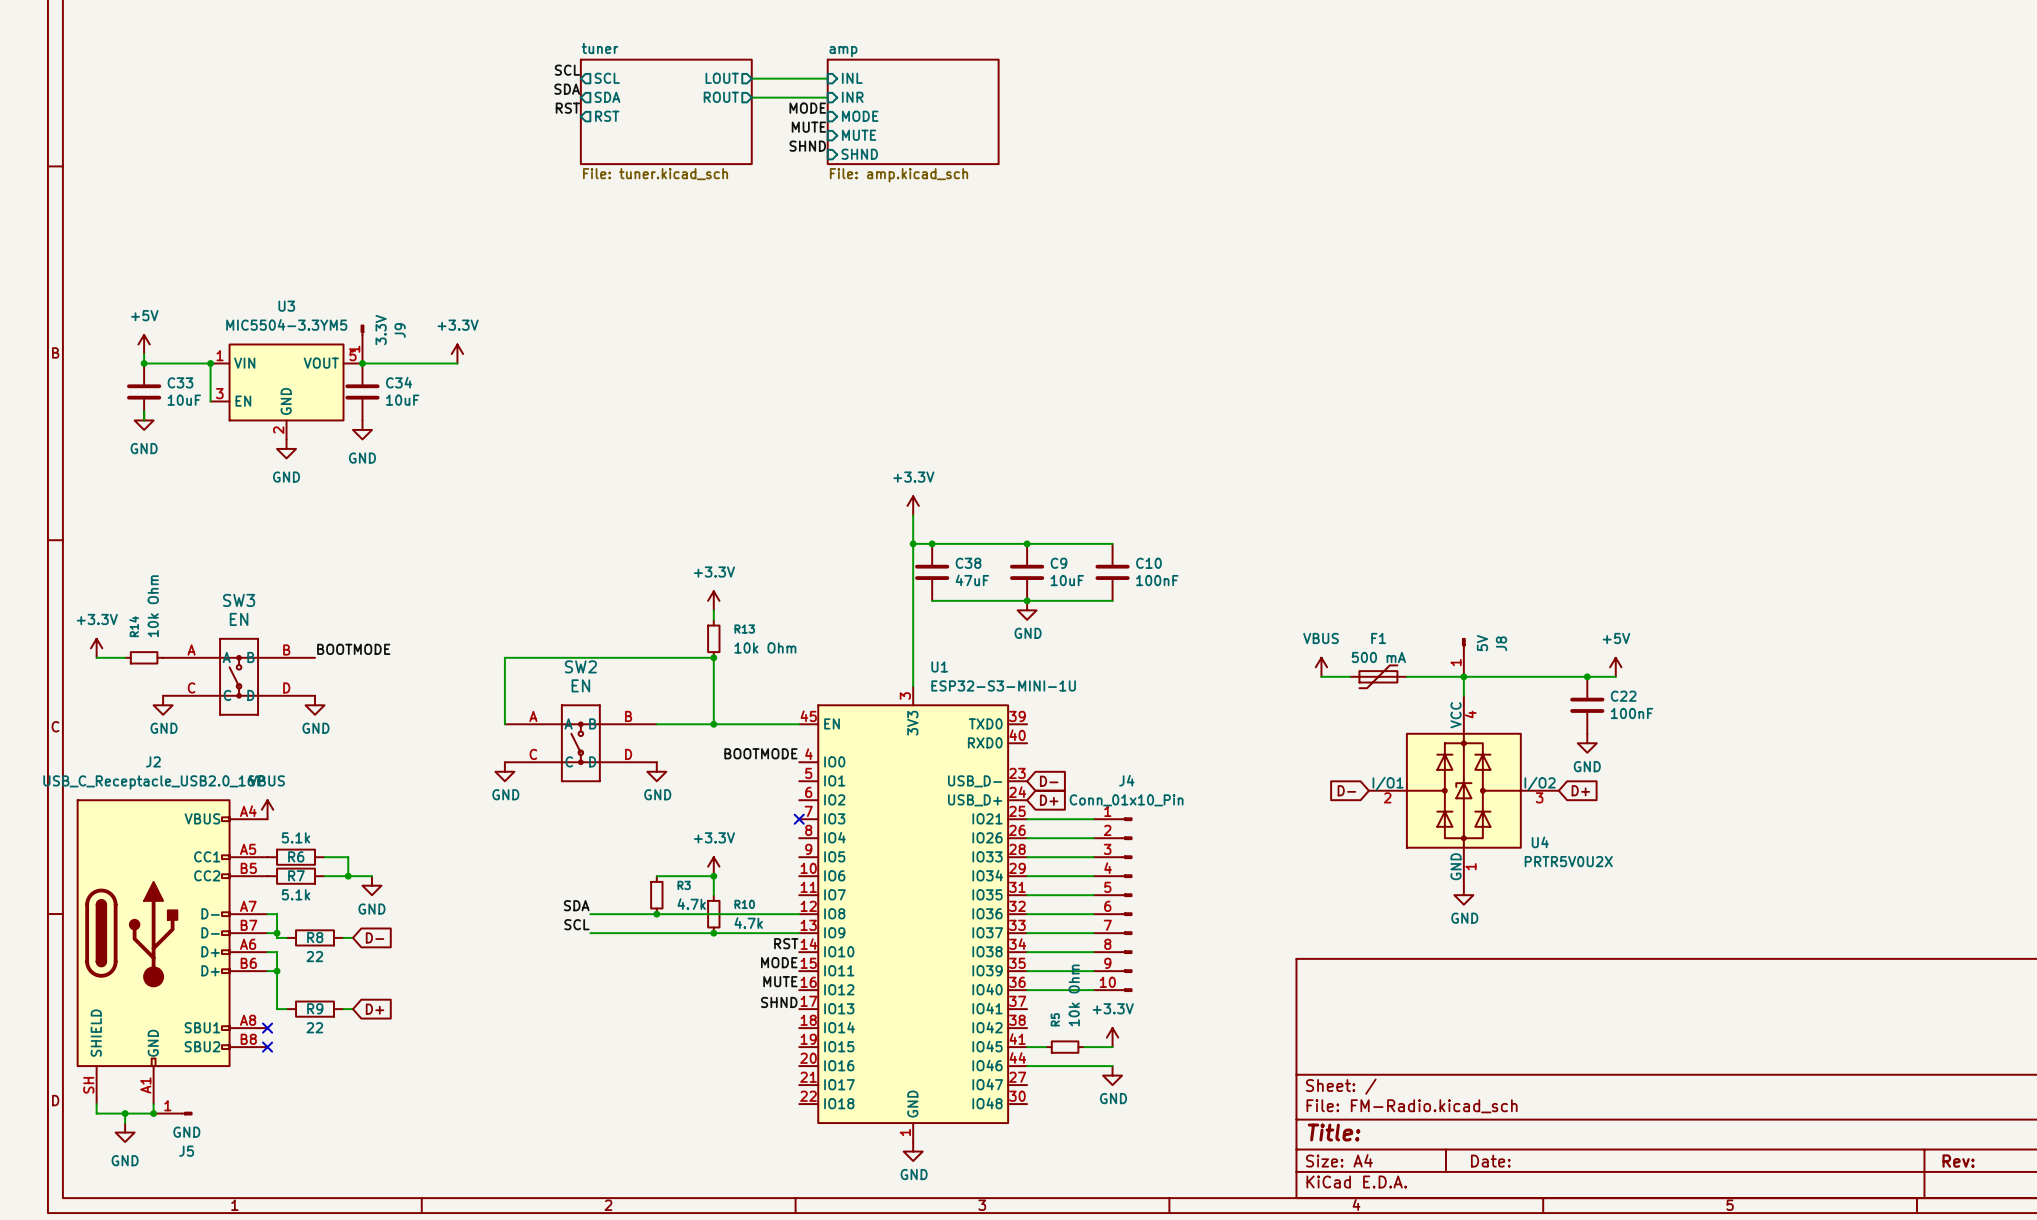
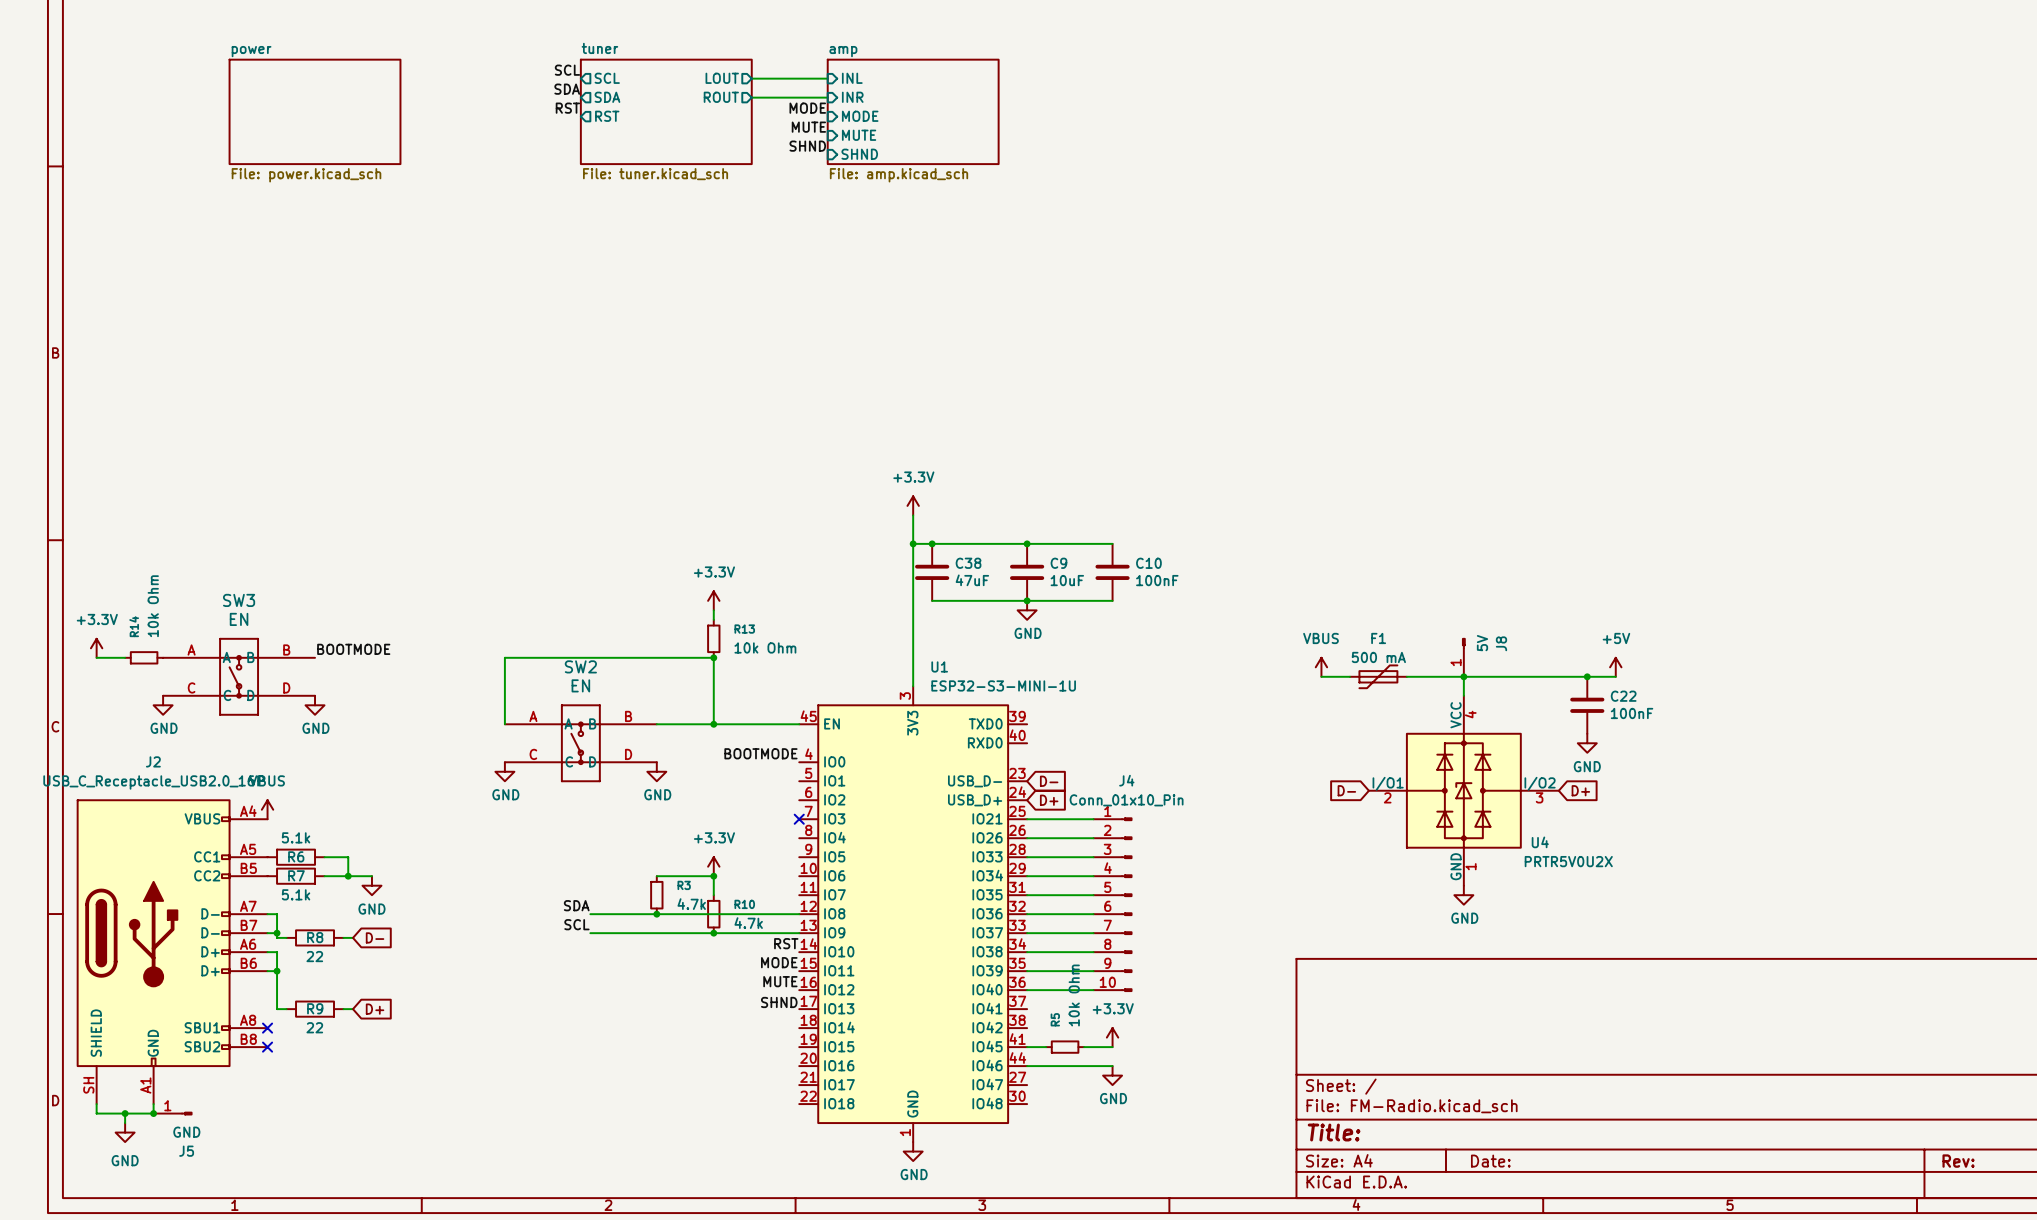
sheet power: none -> File: power.kicad_sch (315, 111)
power symbol: +5V (144, 344) -> none
J9: 3.3V (362, 344) -> none
wire: (144, 353) (144, 363) (210, 363) (210, 401) -> none
power symbol: +3.3V (457, 353) -> none
junction: (144, 363) -> none
junction: (210, 363) -> none
wire: (362, 363) (457, 363) -> none
junction: (362, 363) -> none
C33: 10uF (144, 391) -> none
U3: MIC5504-3.3YM5 (286, 391) -> none
C34: 10uF (362, 391) -> none
wire: (144, 410) (144, 420) -> none
power symbol: GND (144, 420) -> none
power symbol: GND (362, 429) -> none
power symbol: GND (286, 448) -> none

